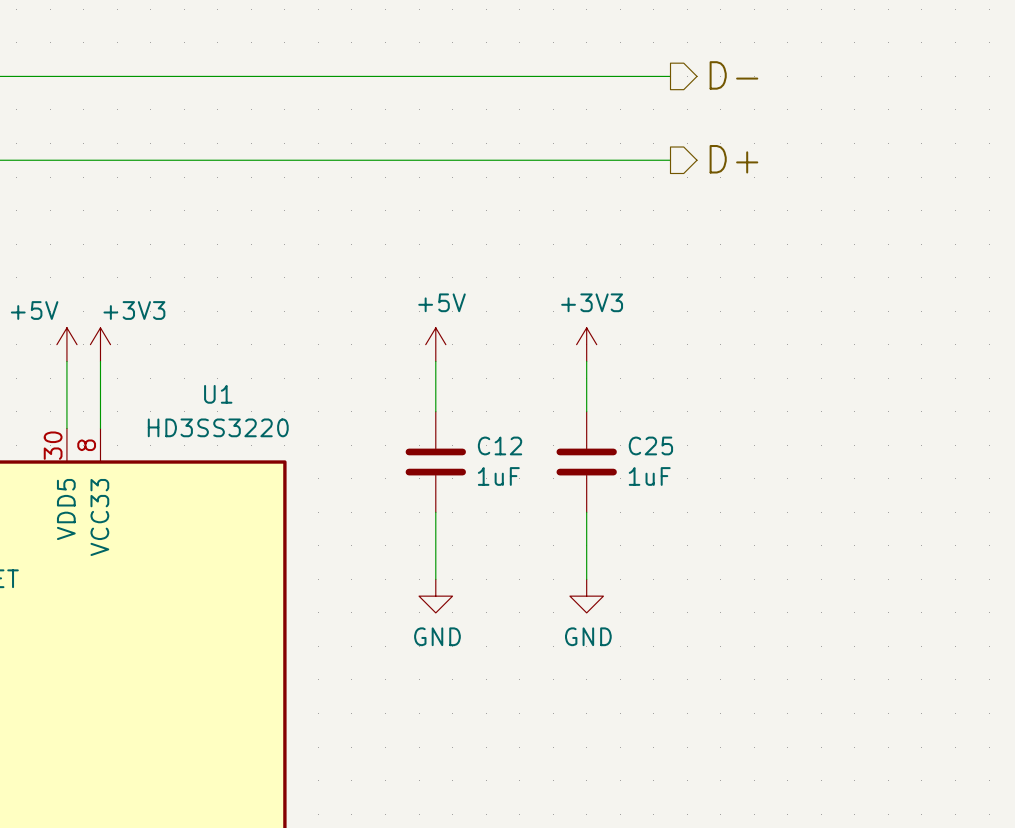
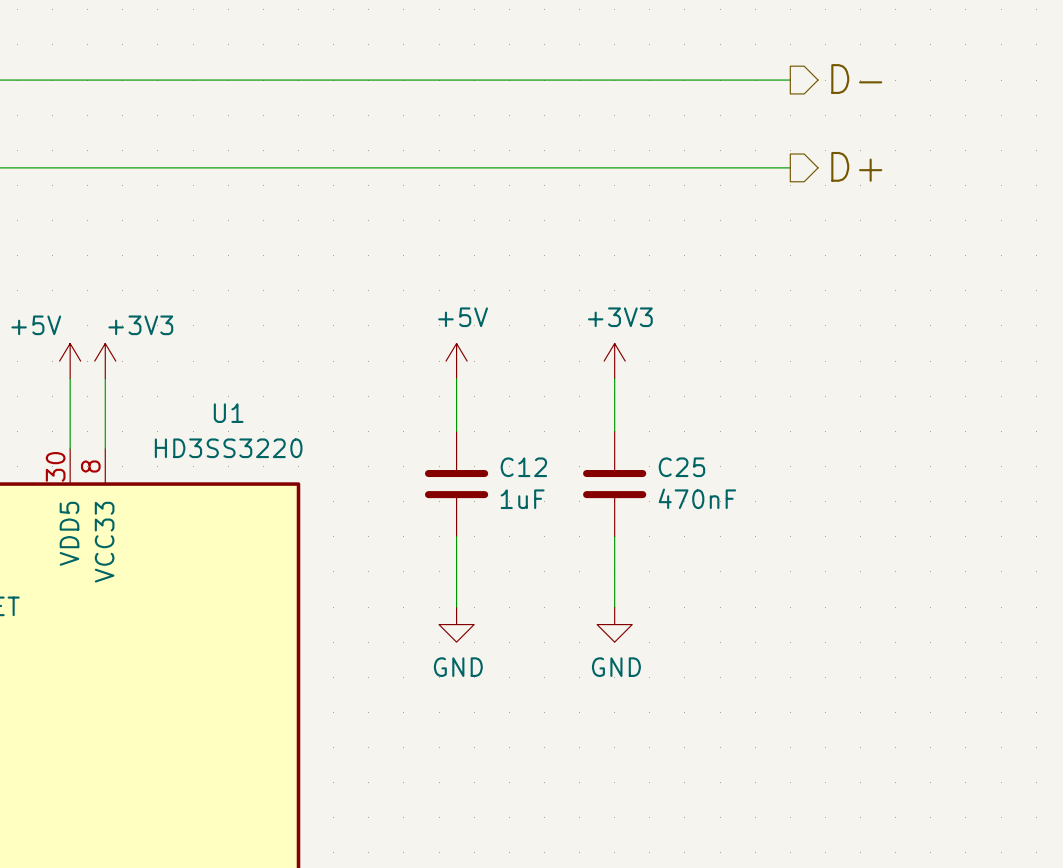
hierarchical label position: D- (733, 75) -> D- (856, 79)
wire: none -> (702, 80) (790, 80)
hierarchical label position: D+ (733, 159) -> D+ (856, 166)
wire: none -> (702, 167) (790, 167)
C25 value: 1uF (649, 476) -> 470nF (697, 498)

